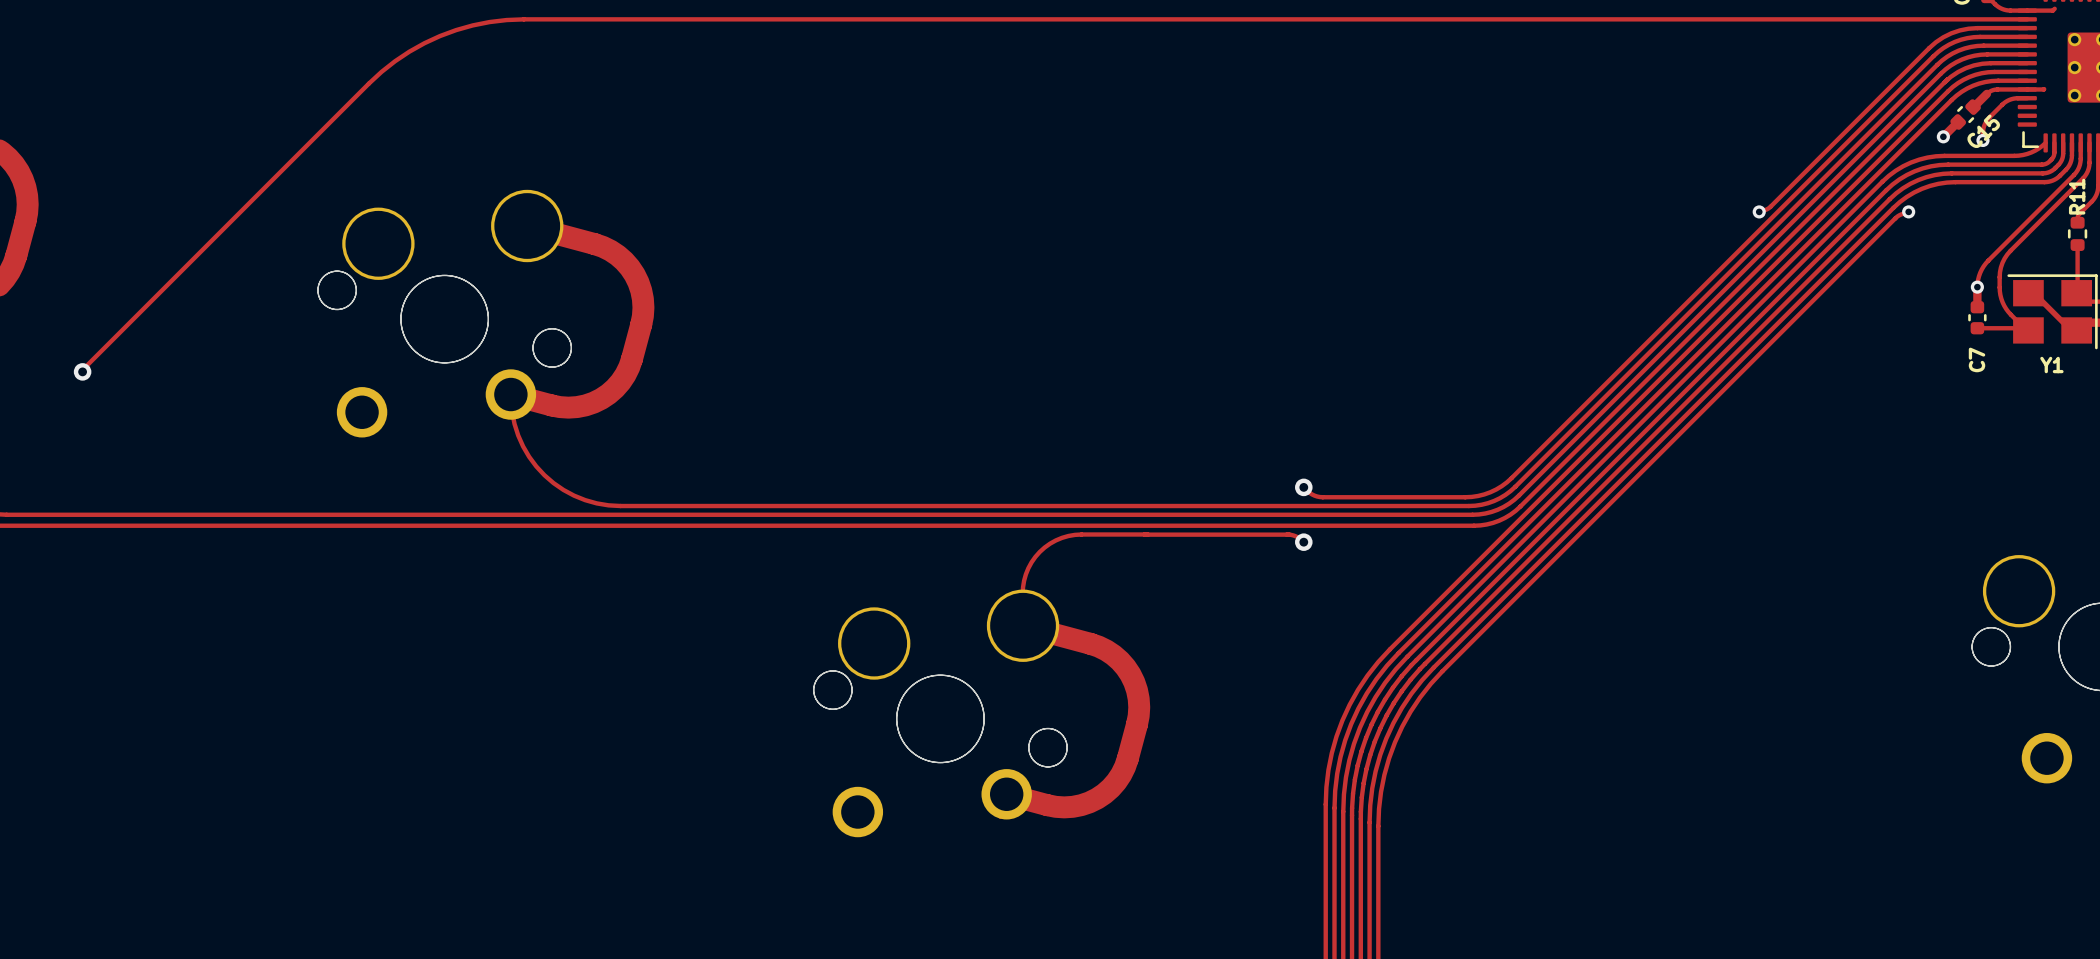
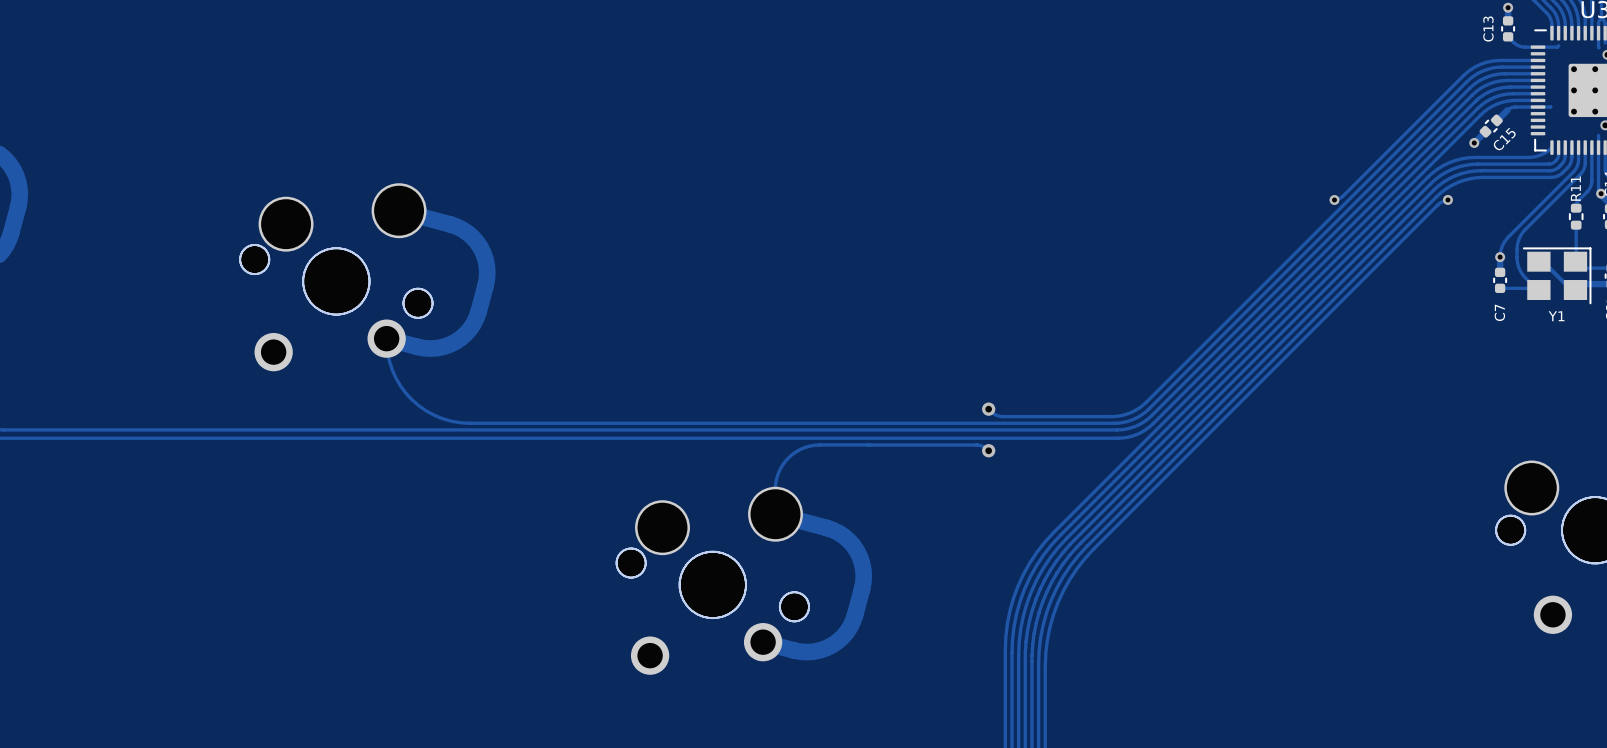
track: (2027, 19) (523, 19) (489, 22) (440, 36) (409, 51) (381, 71) (80, 371) (82, 370) -> none
track: (2027, 98) (2011, 99) (2002, 104) (1985, 122) (1983, 139) -> none
via: (1982, 140) -> none
via: (82, 371) -> none

